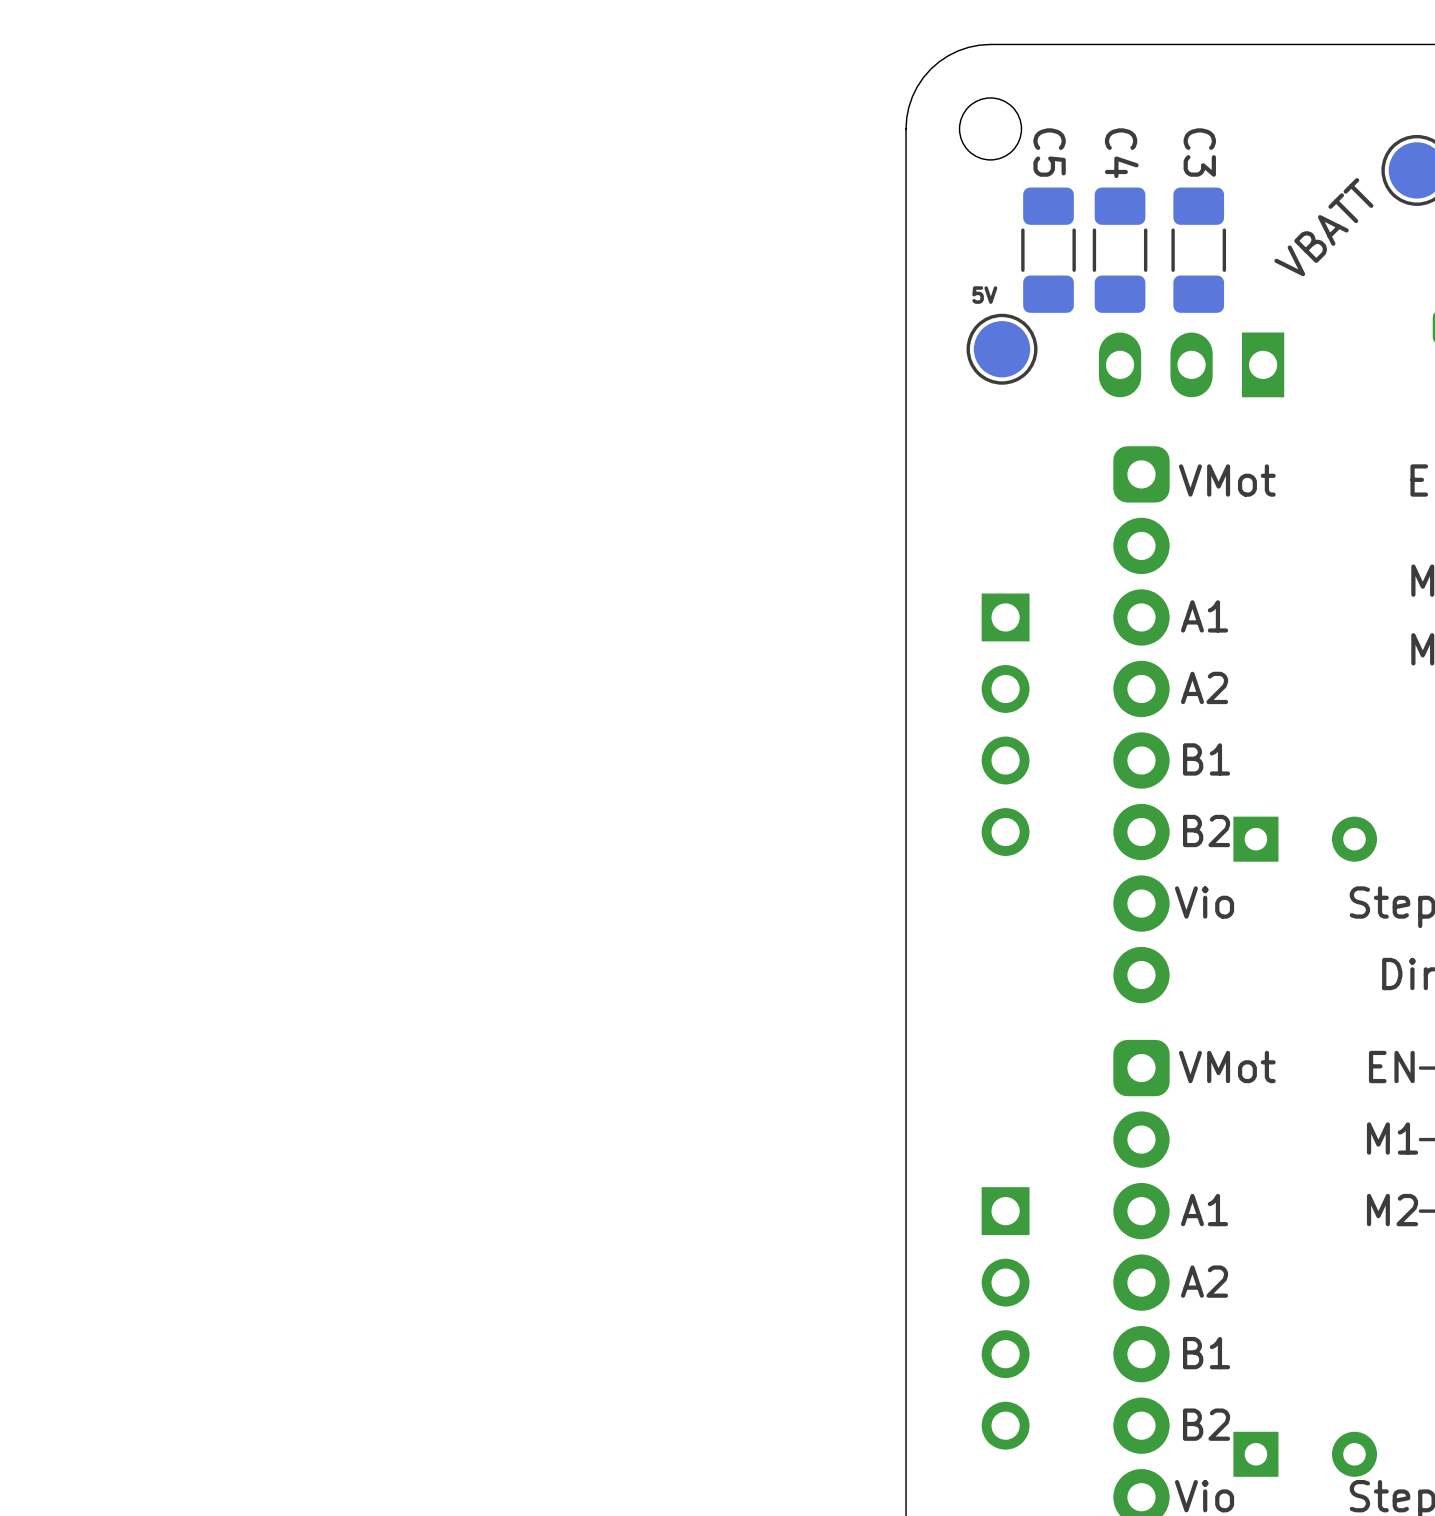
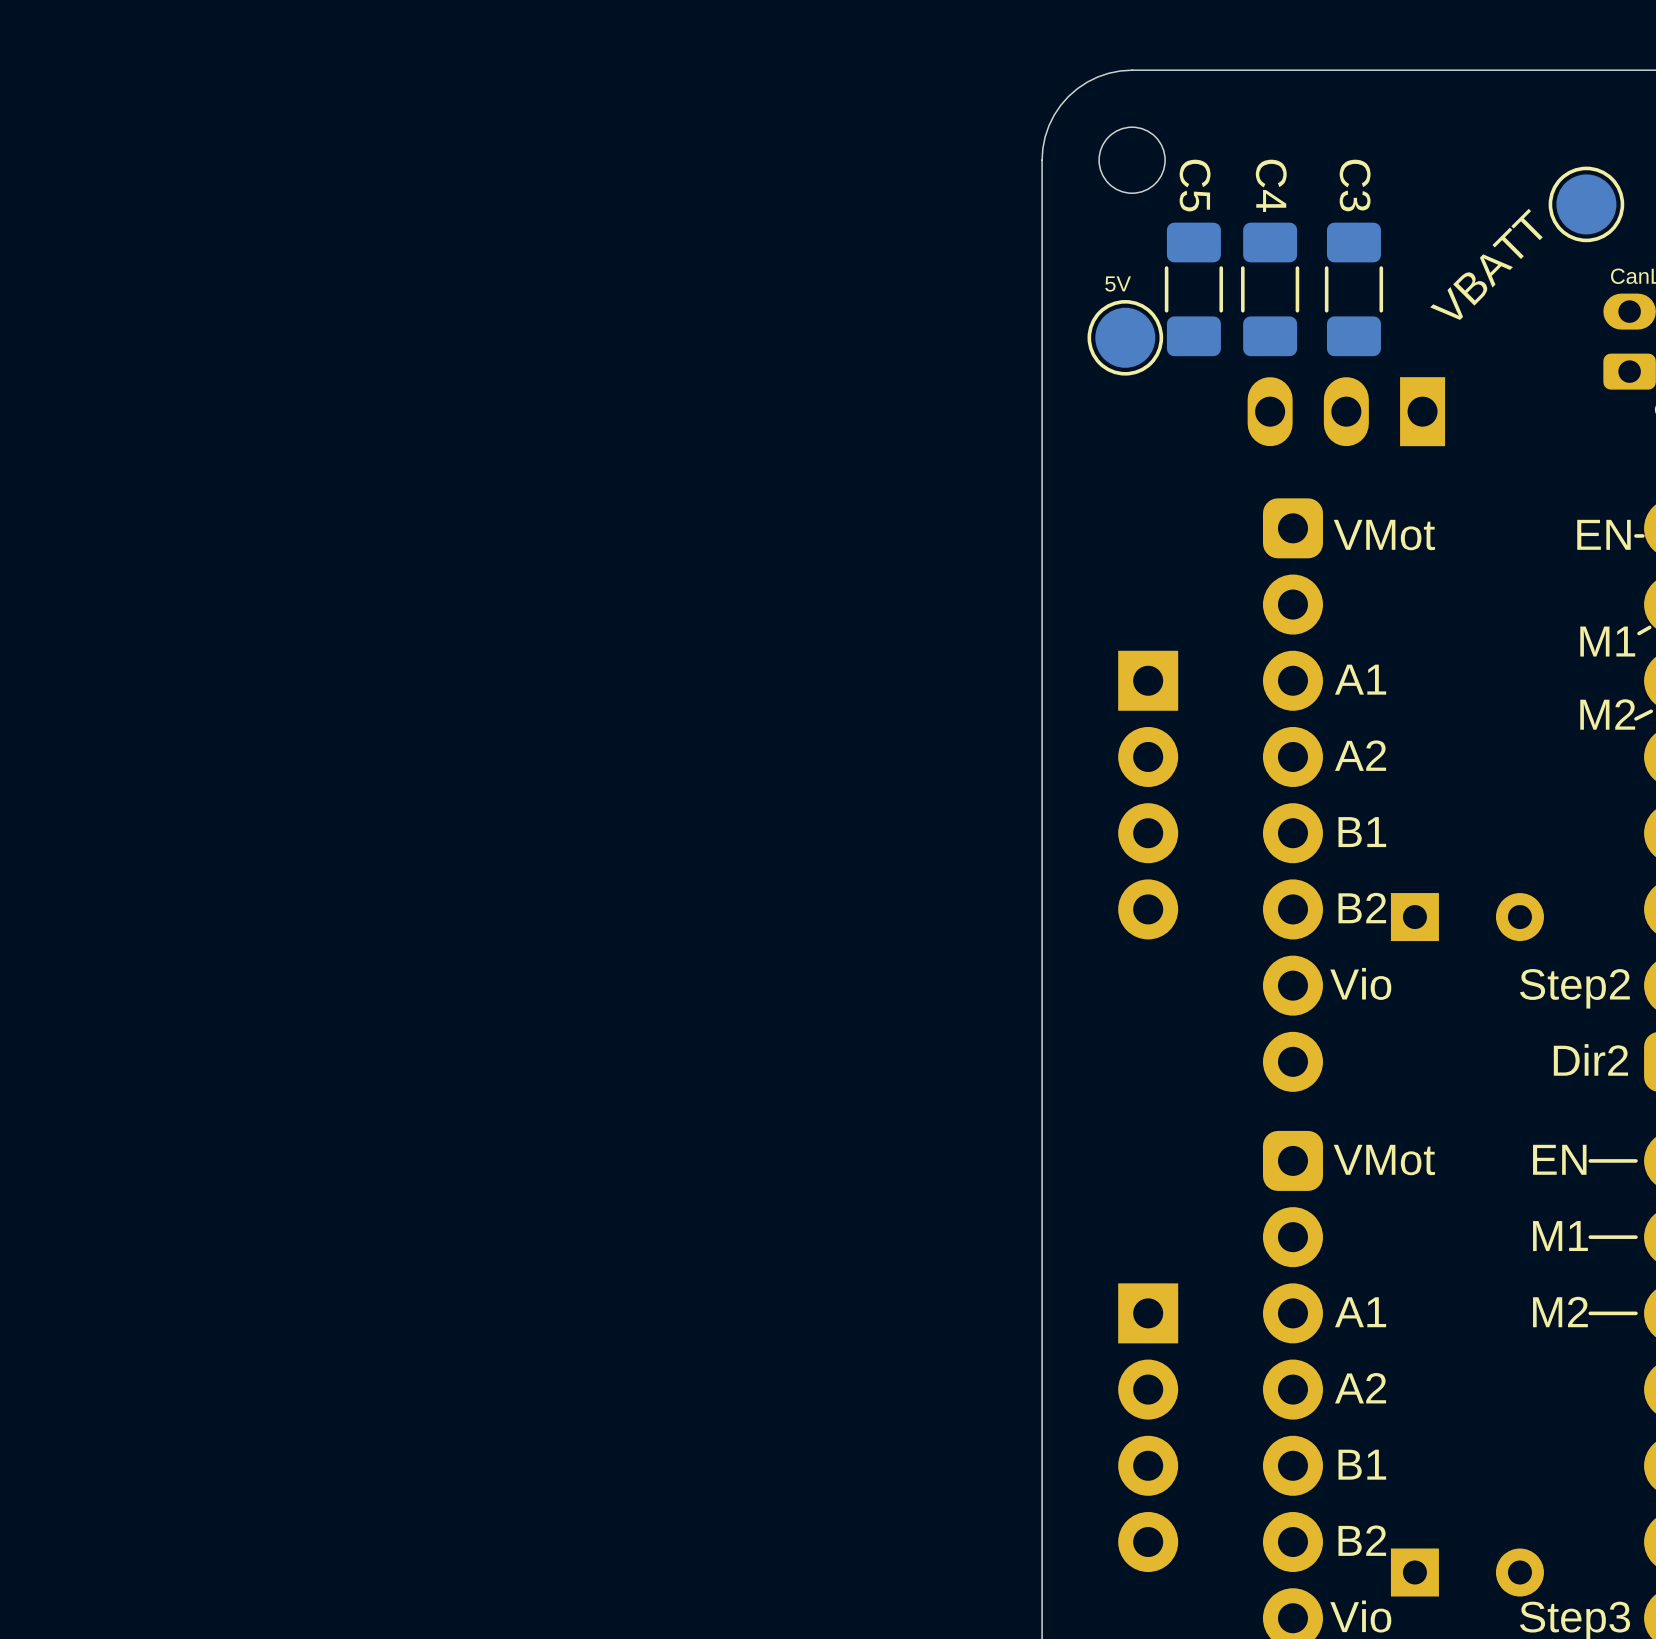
text position: 5V (984, 295) -> 5V (1118, 283)
part position: (1002, 349) -> (1125, 337)
part footprint: [981, 593, 1030, 856] -> [1118, 650, 1179, 940]
part footprint: [981, 1187, 1030, 1450] -> [1118, 1283, 1179, 1573]

